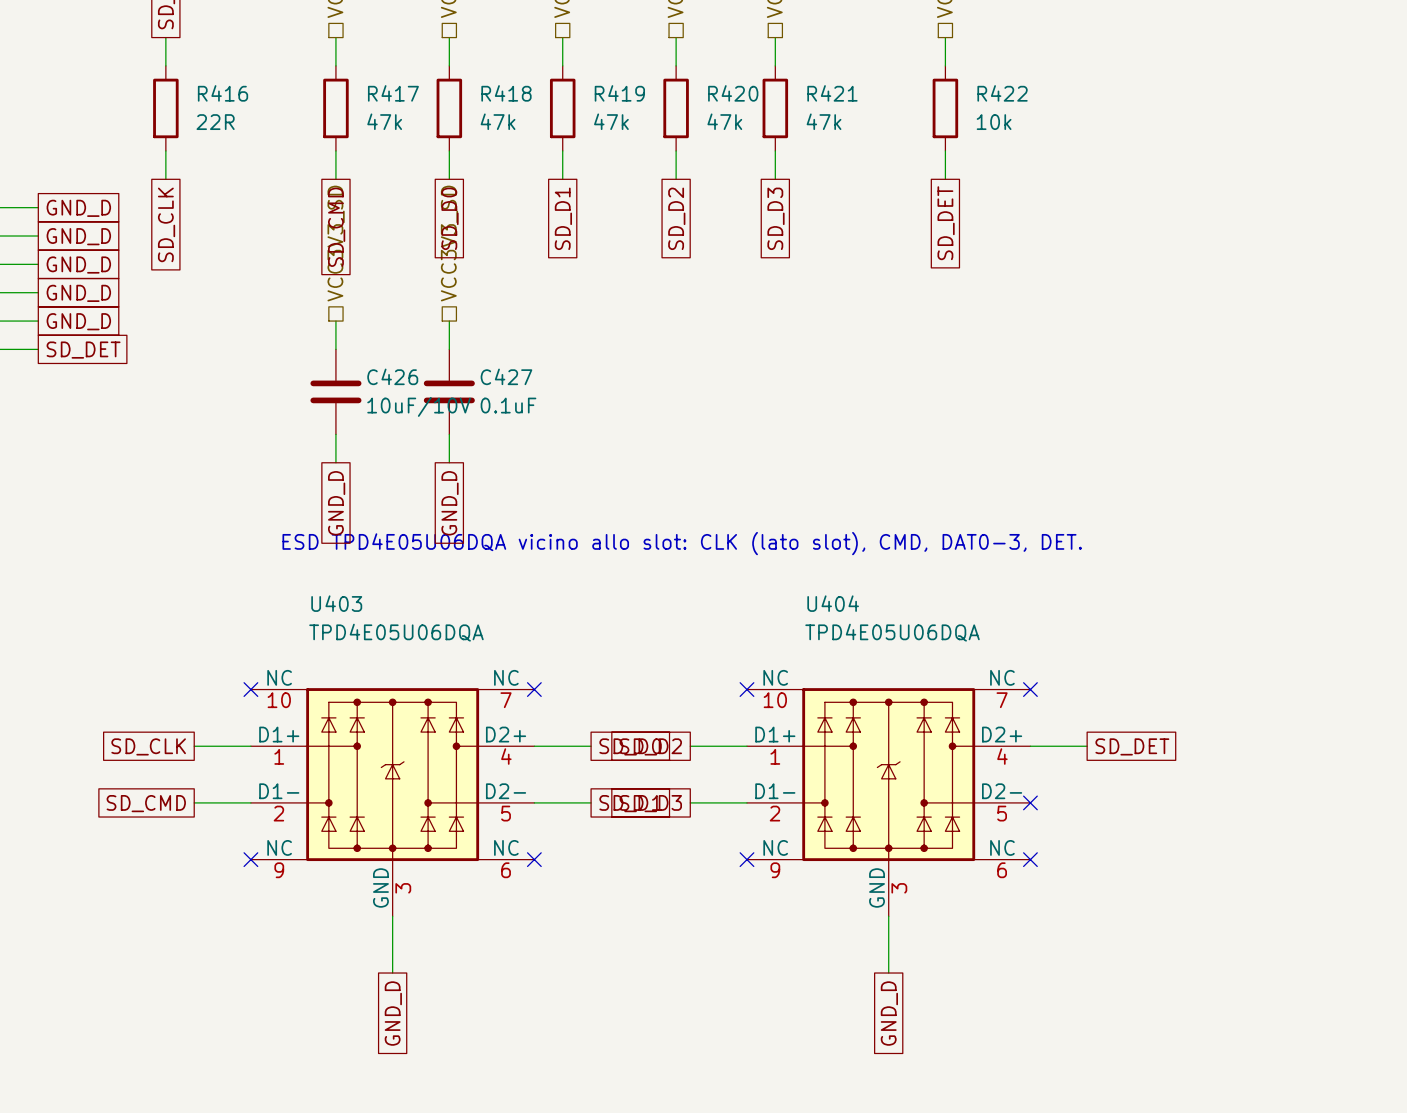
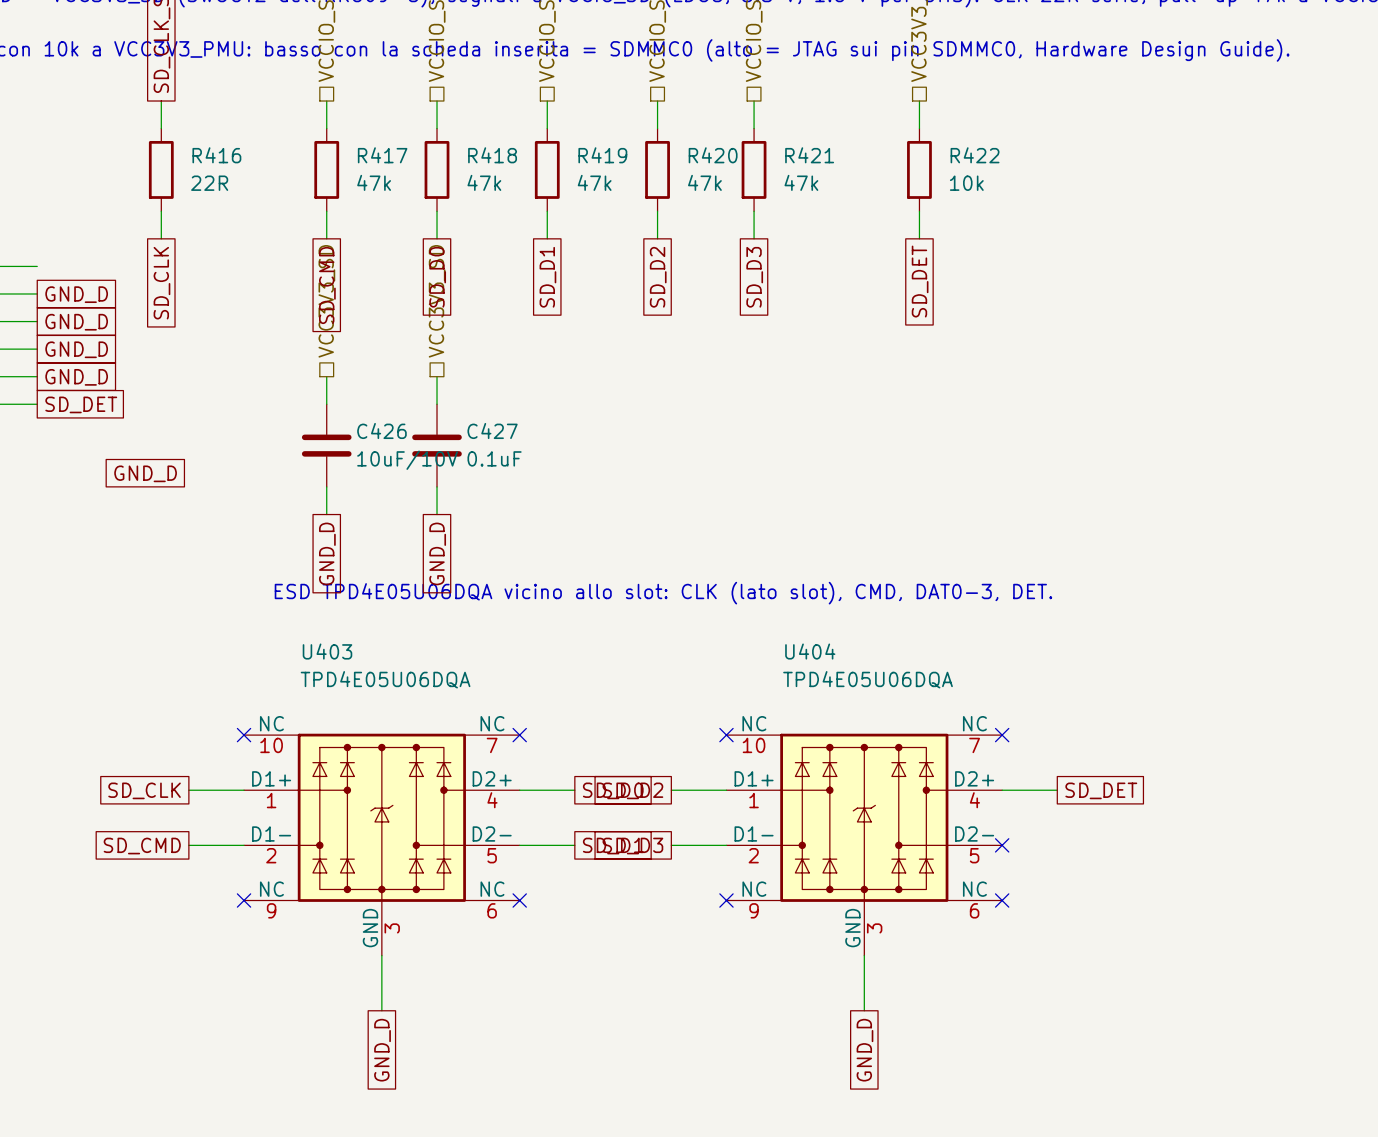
global label position: GND_D (78, 208) -> GND_D (145, 473)

